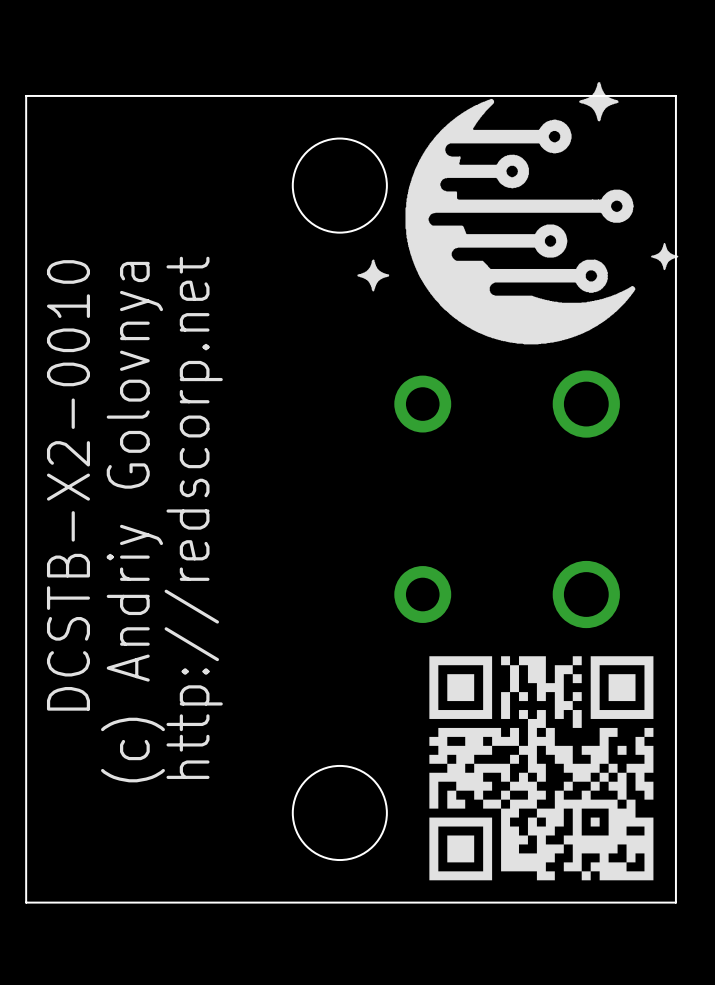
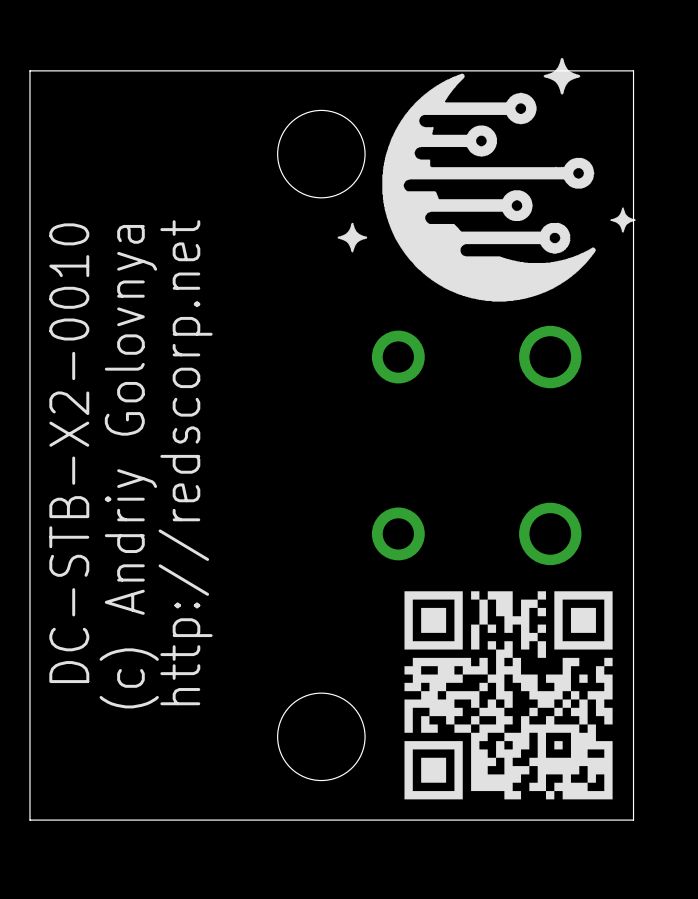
text: DCSTB-X2-0010 (68, 485) -> DC-STB-X2-0010 (69, 453)

